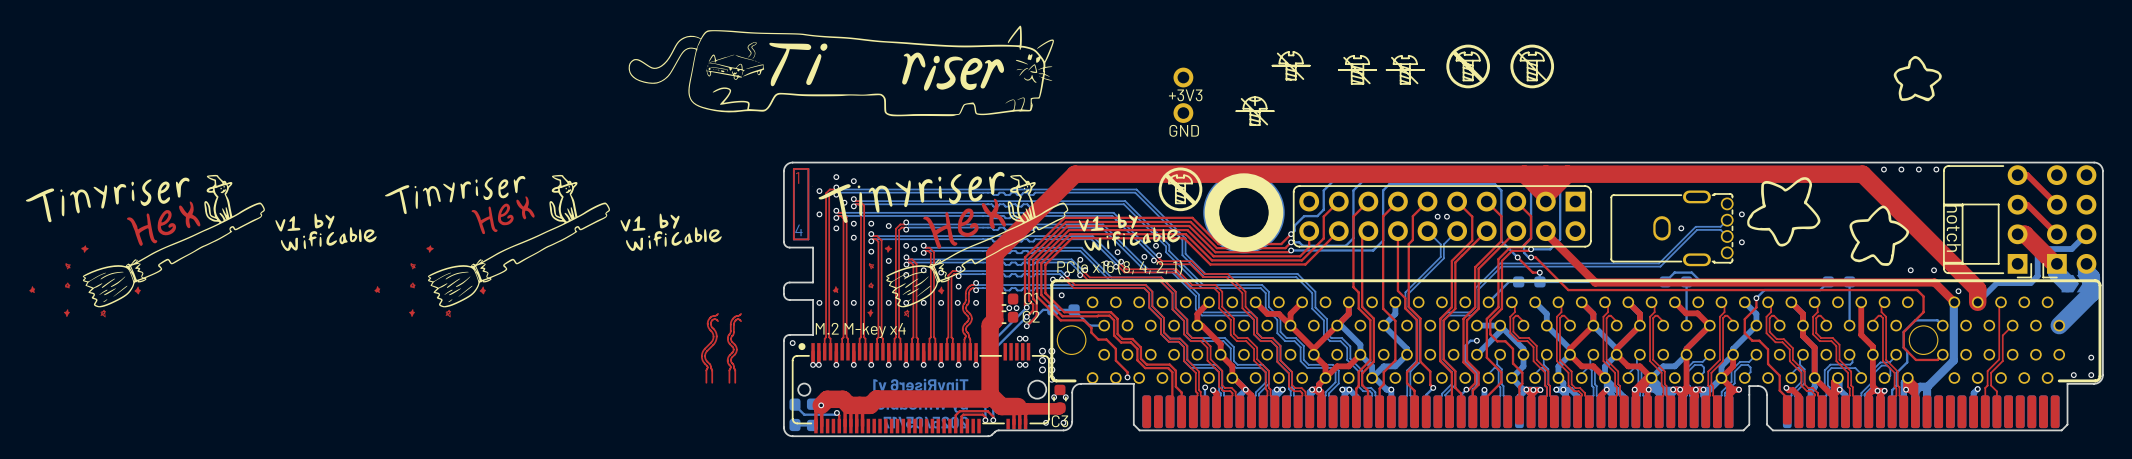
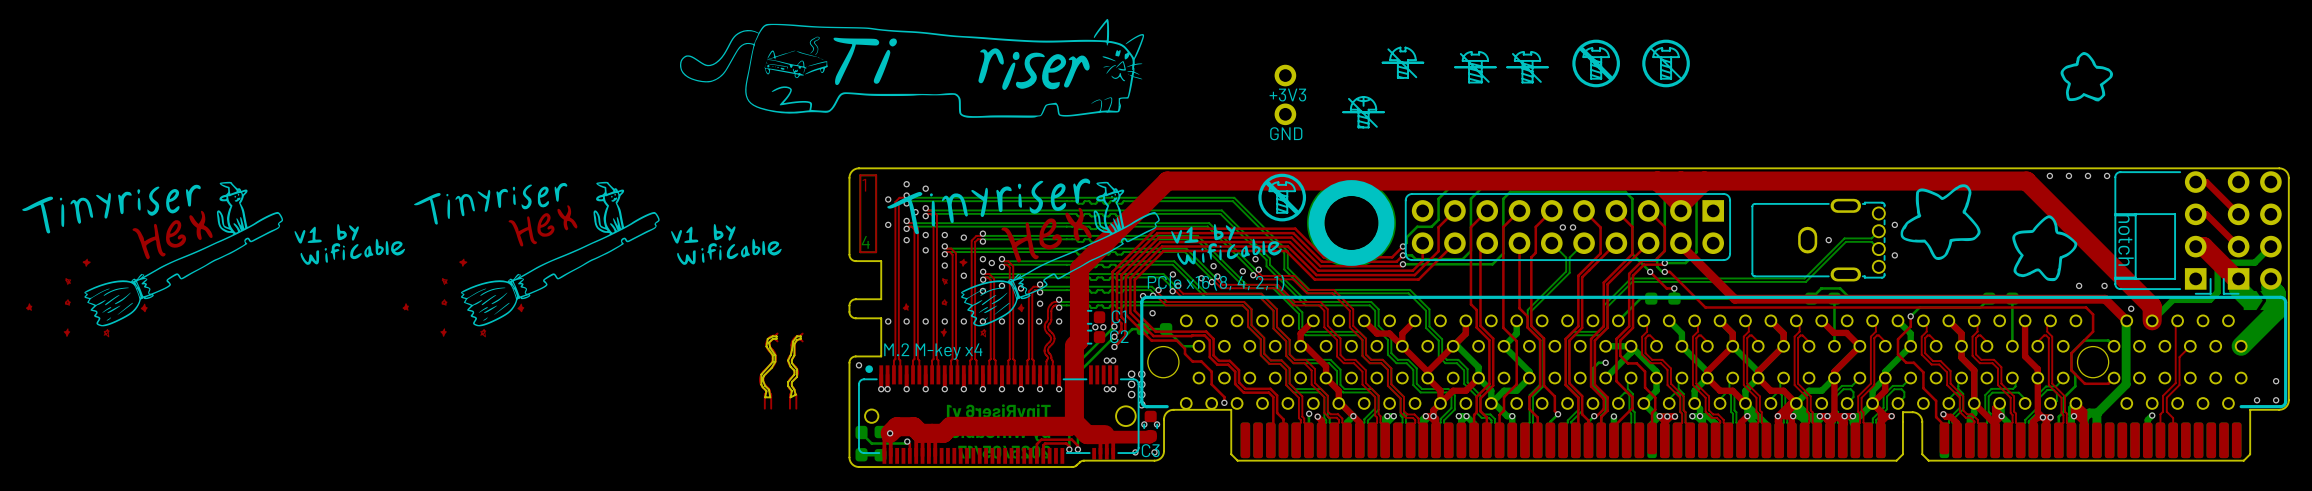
board edge: none -> (772, 336) (776, 336) (776, 338) (772, 338) (769, 342) (775, 355) (775, 361) (762, 379) (769, 389) (770, 397) (765, 397) (766, 391) (761, 384) (761, 374) (772, 361) (772, 355) (766, 346) (767, 338) (772, 336)
board edge: none -> (796, 336) (800, 336) (800, 338) (794, 343) (794, 355) (791, 359) (796, 369) (796, 377) (791, 382) (795, 394) (790, 397) (791, 391) (788, 385) (788, 382) (794, 374) (794, 370) (788, 360) (793, 341) (796, 336)

